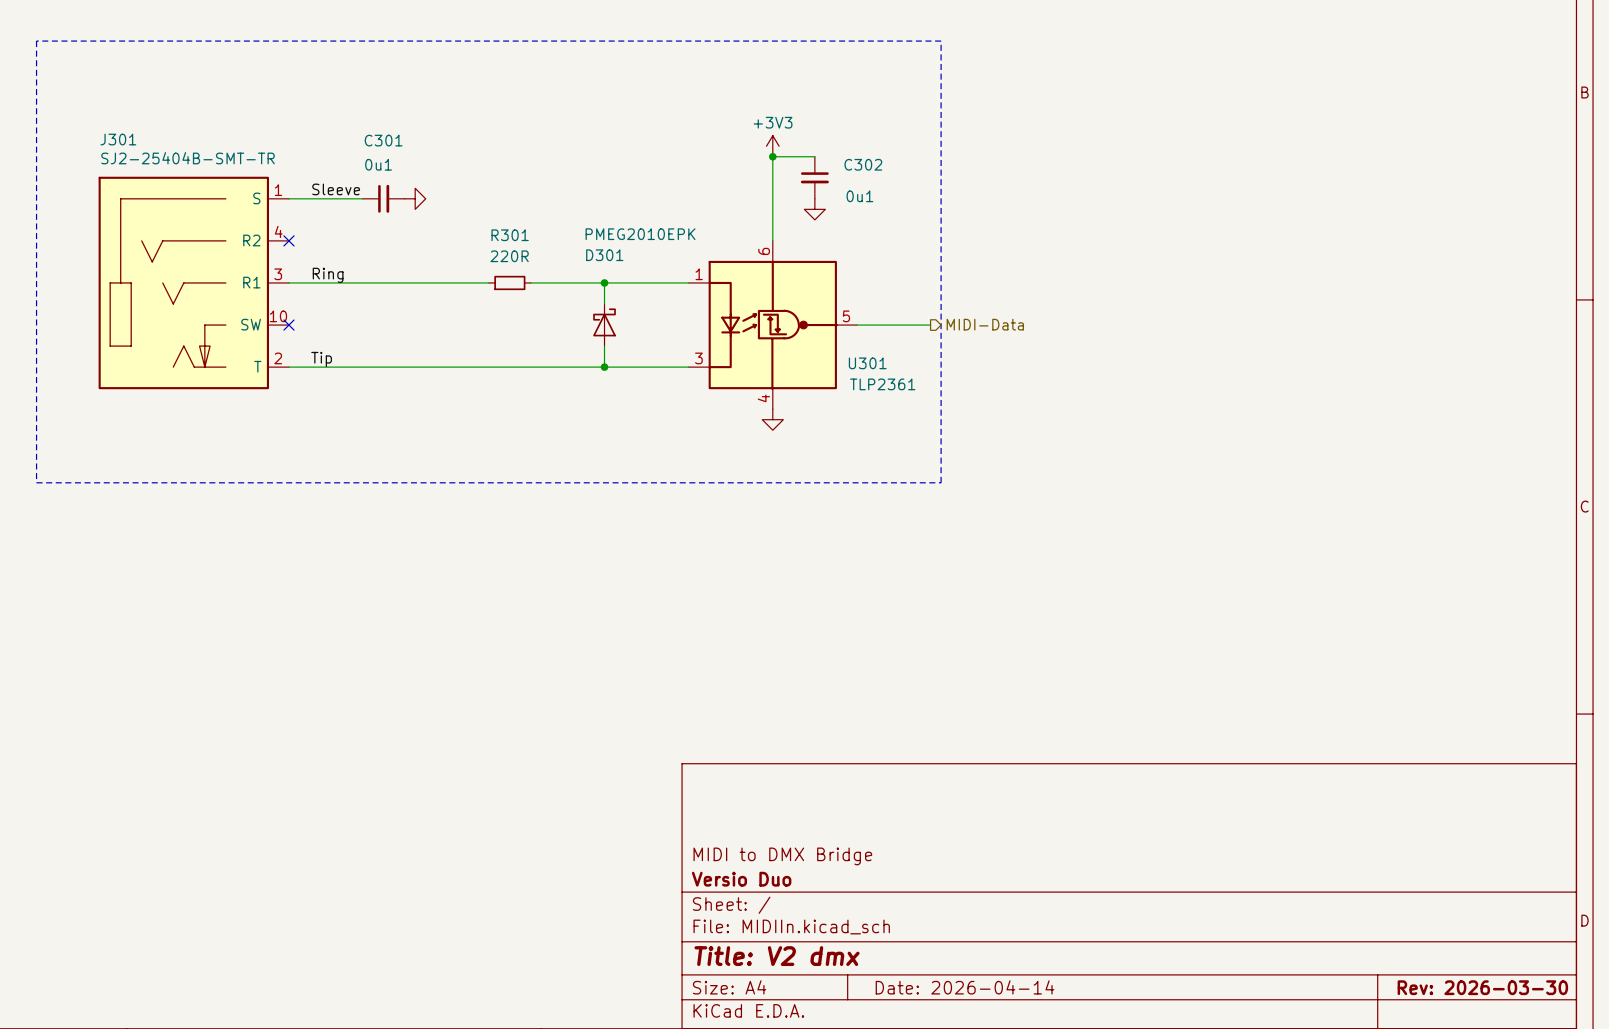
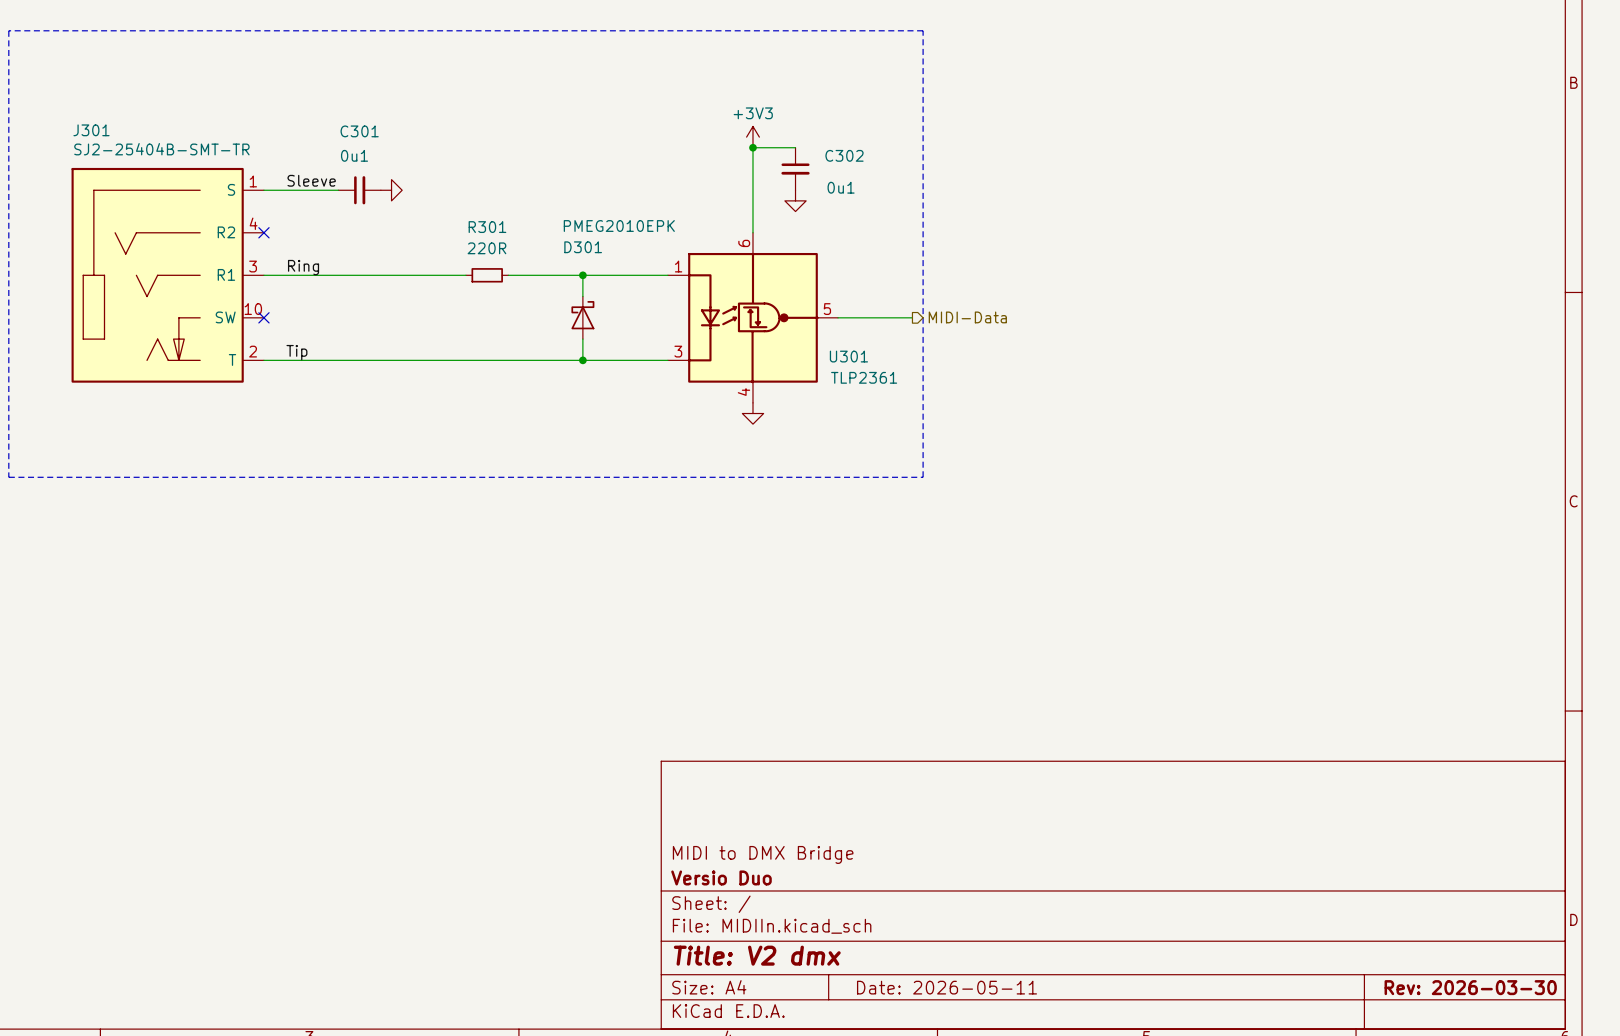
title block: Date: 2026-04-14 (965, 987) -> Date: 2026-05-11 (947, 987)

